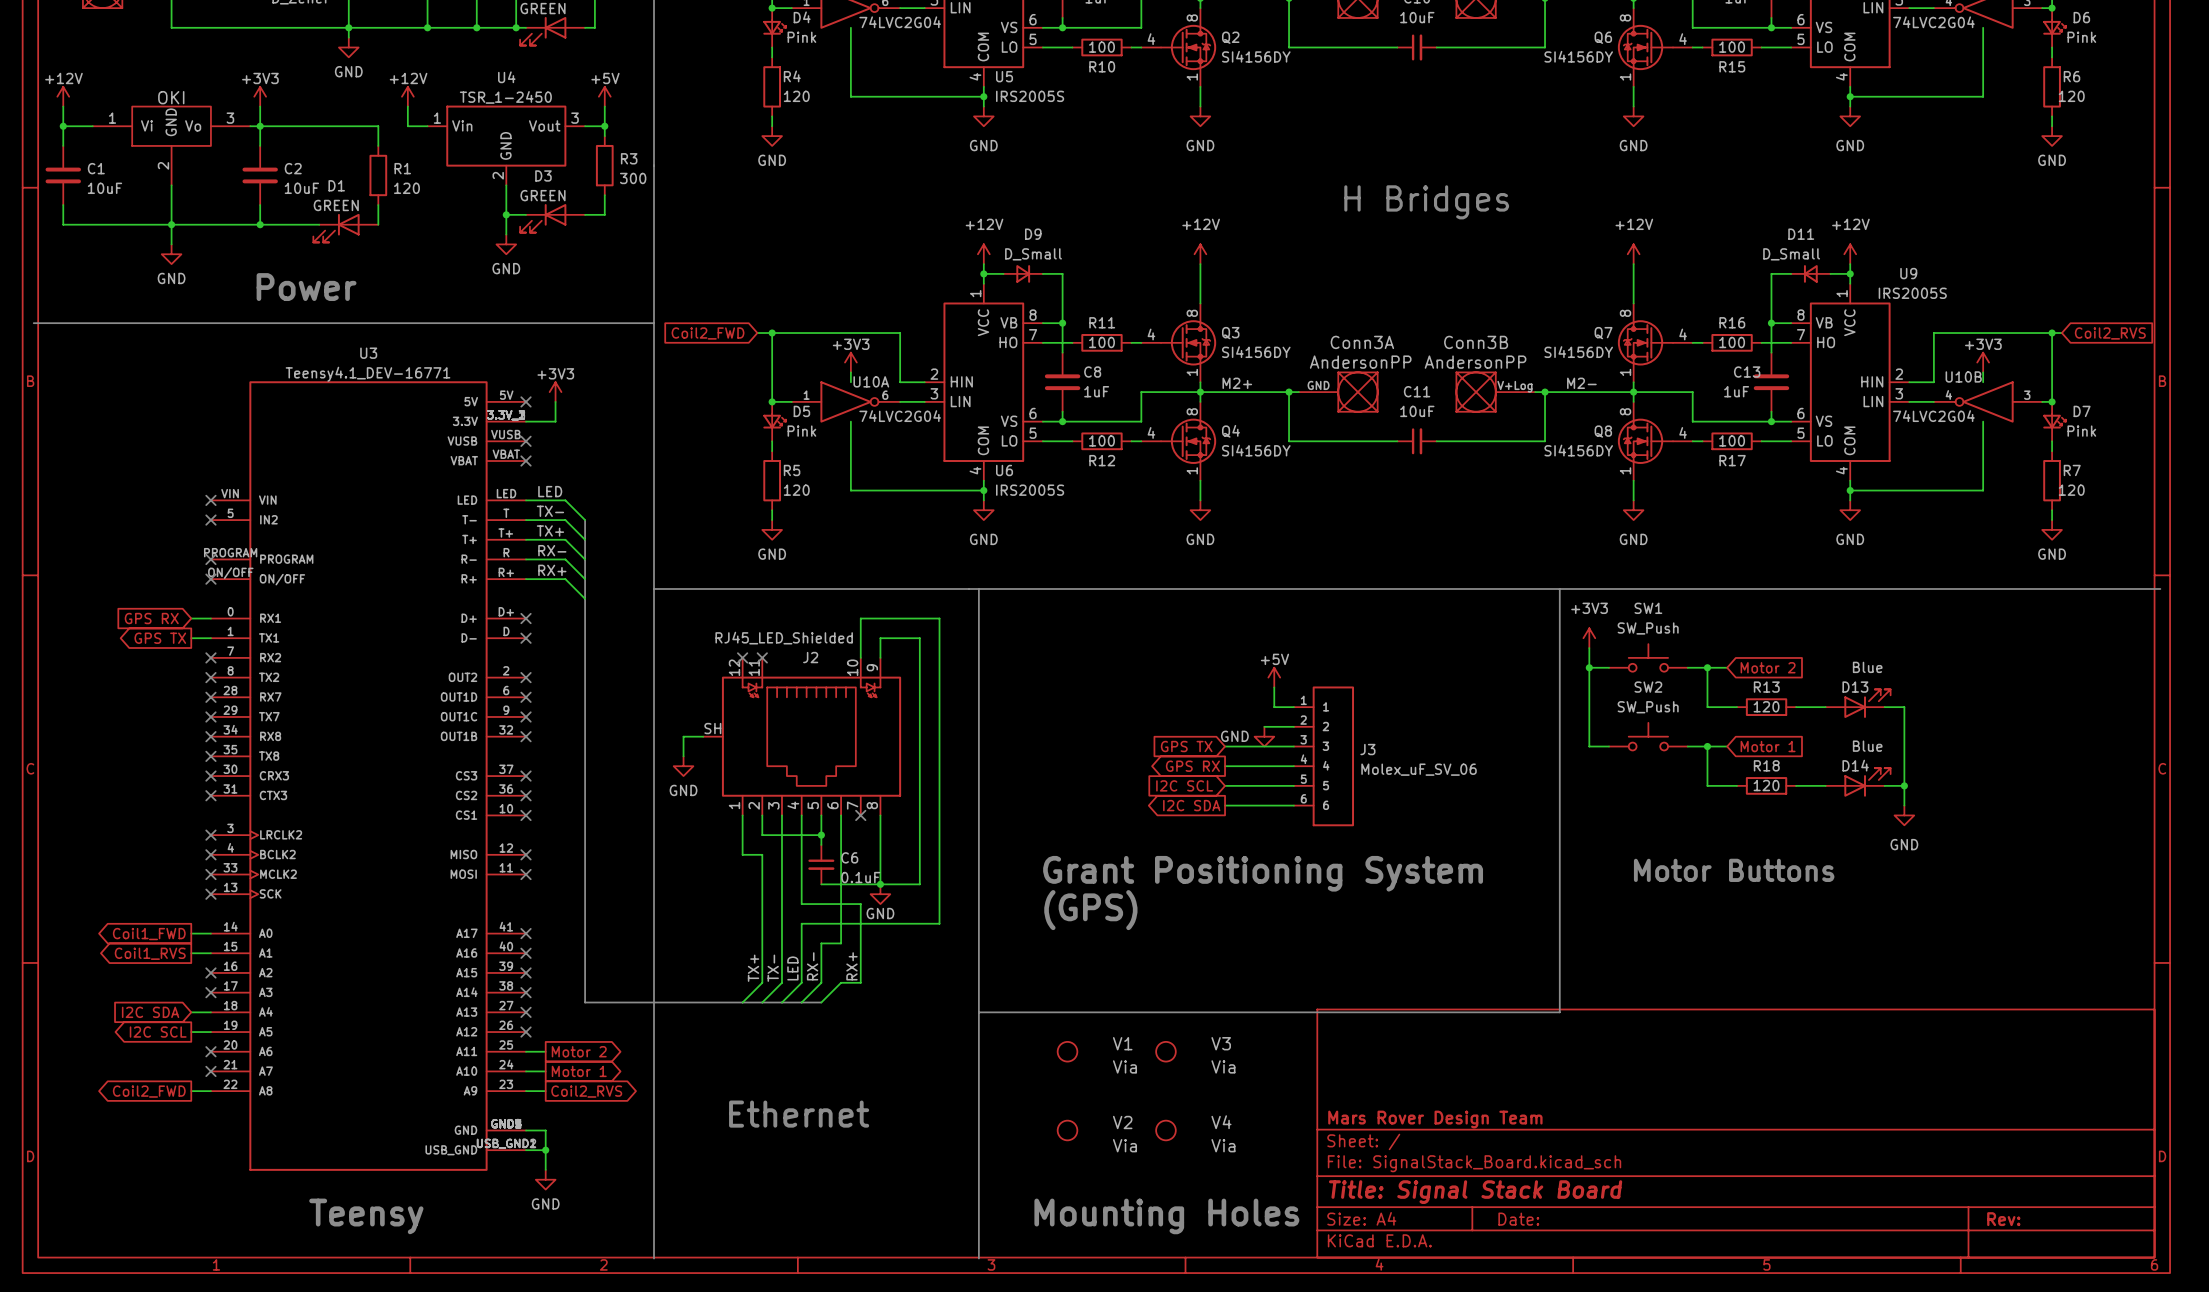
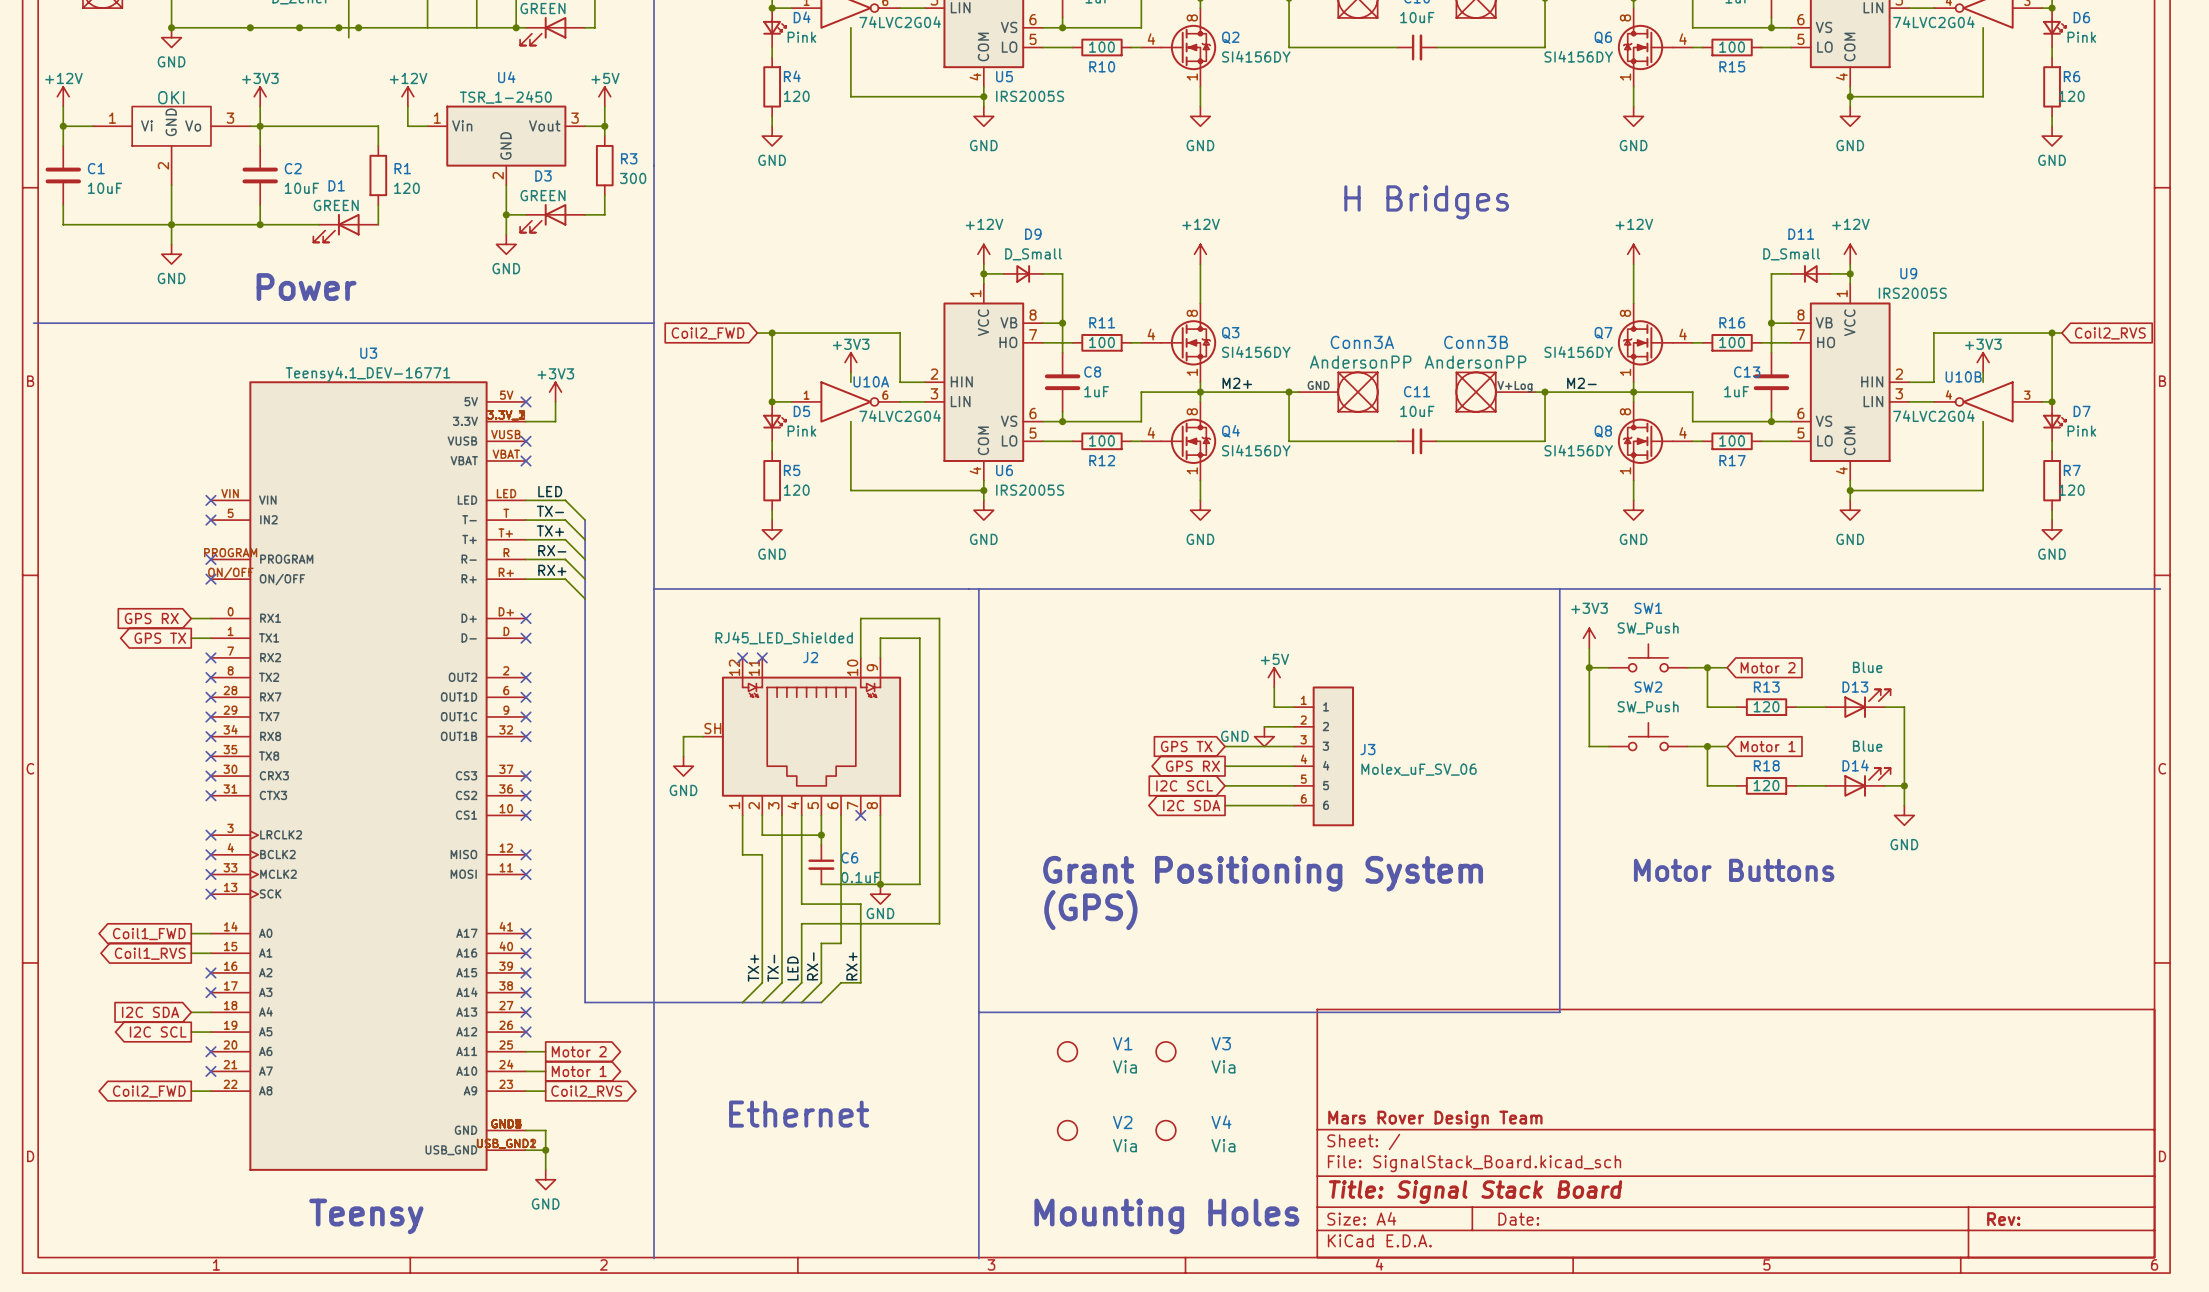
junction: none -> (171, 27)
junction: none -> (250, 27)
junction: none -> (299, 27)
junction: none -> (338, 27)
junction: (348, 27) -> none
junction: none -> (358, 27)
junction: (427, 27) -> none
junction: (476, 27) -> none
power symbol position: GND (348, 47) -> GND (171, 37)

